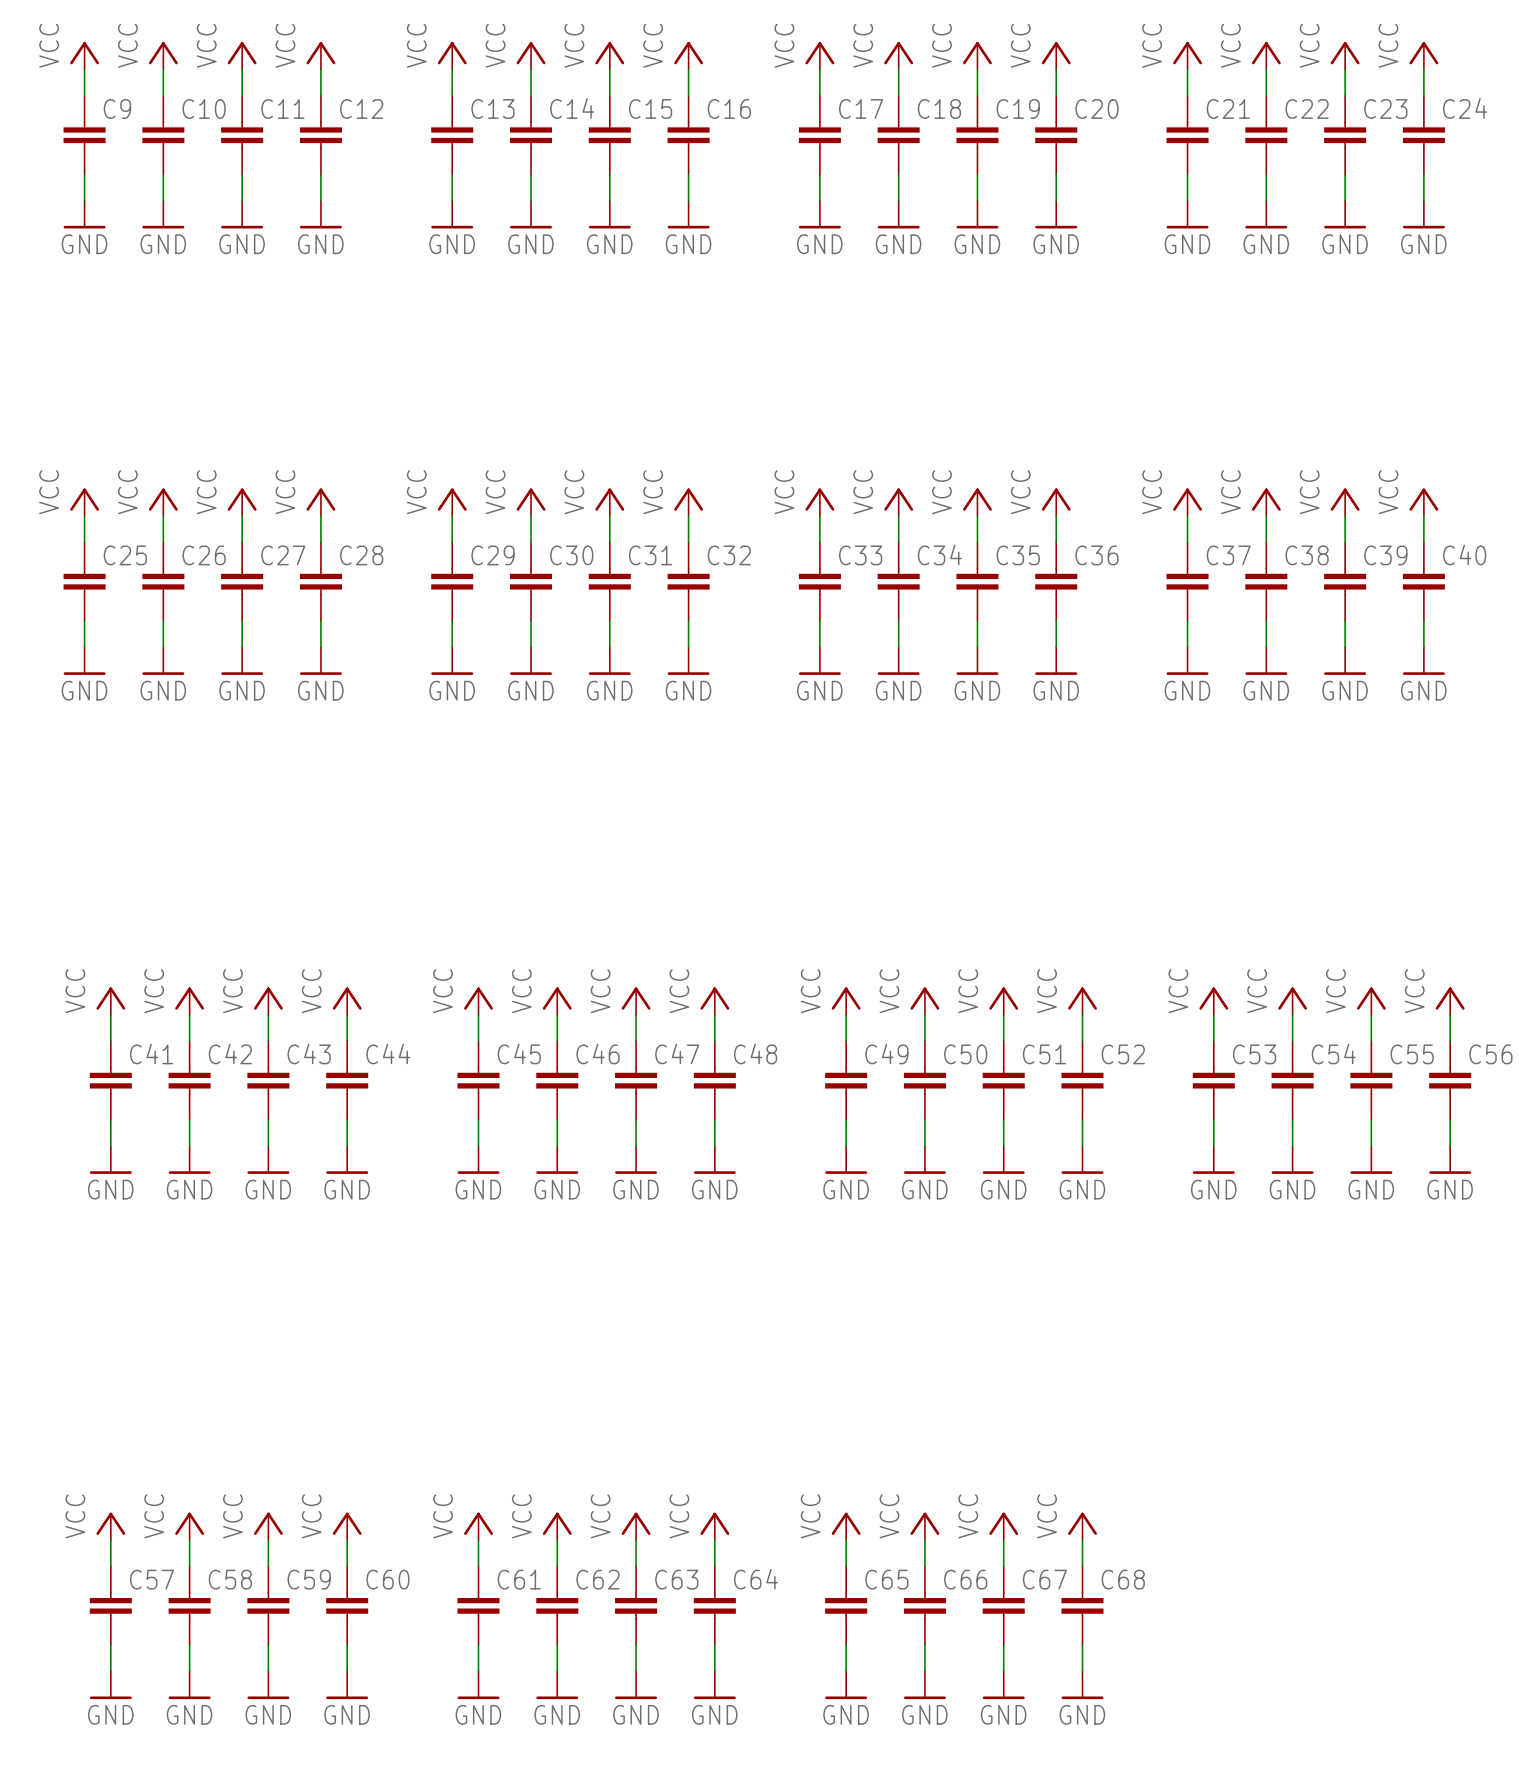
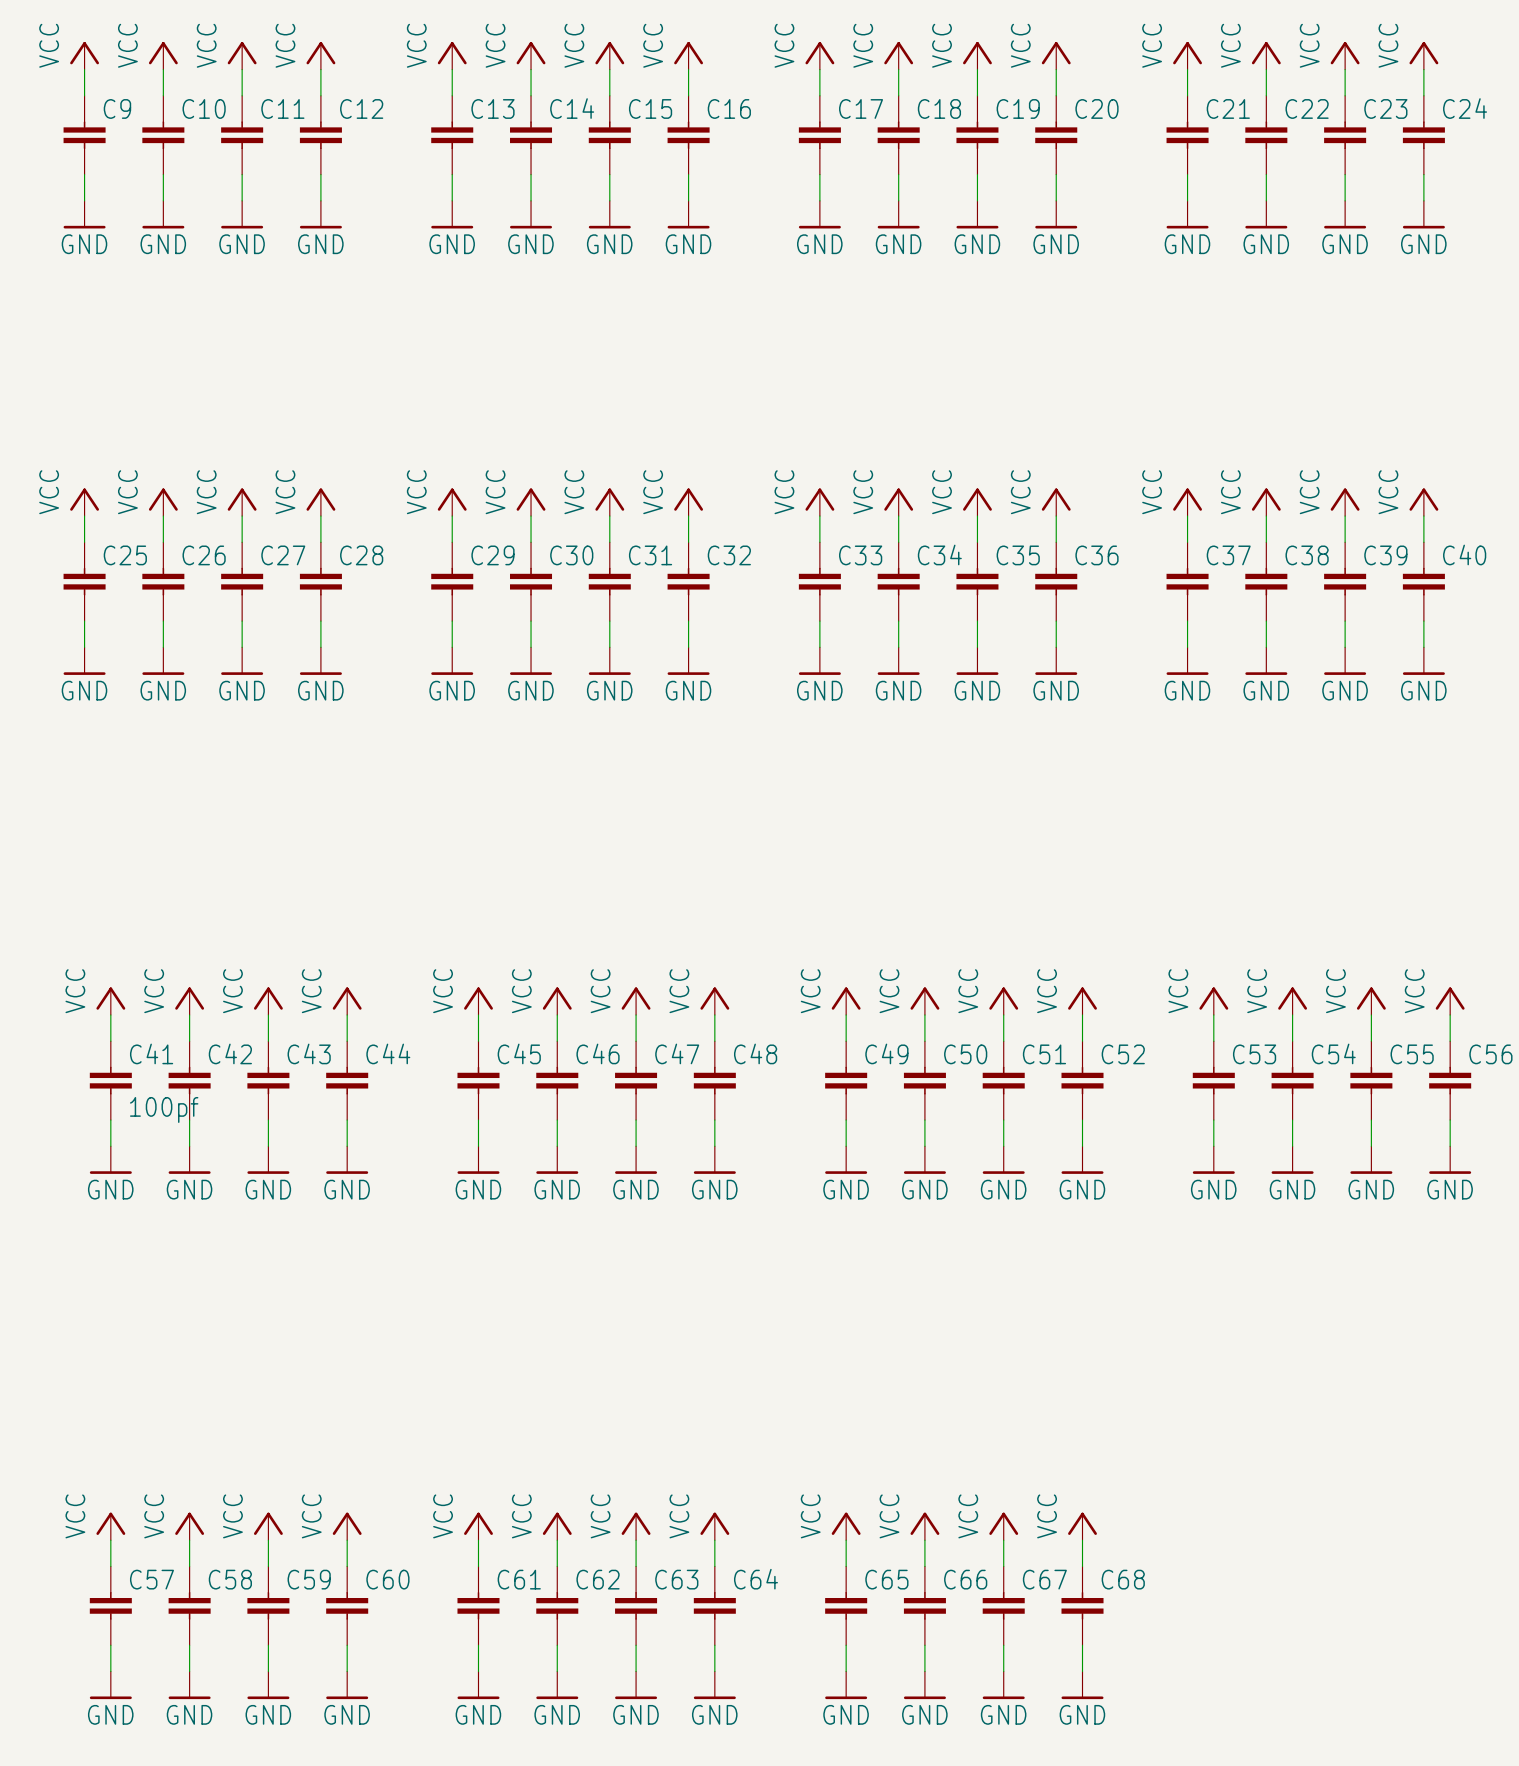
C41 value: none -> 100pf (164, 1109)

